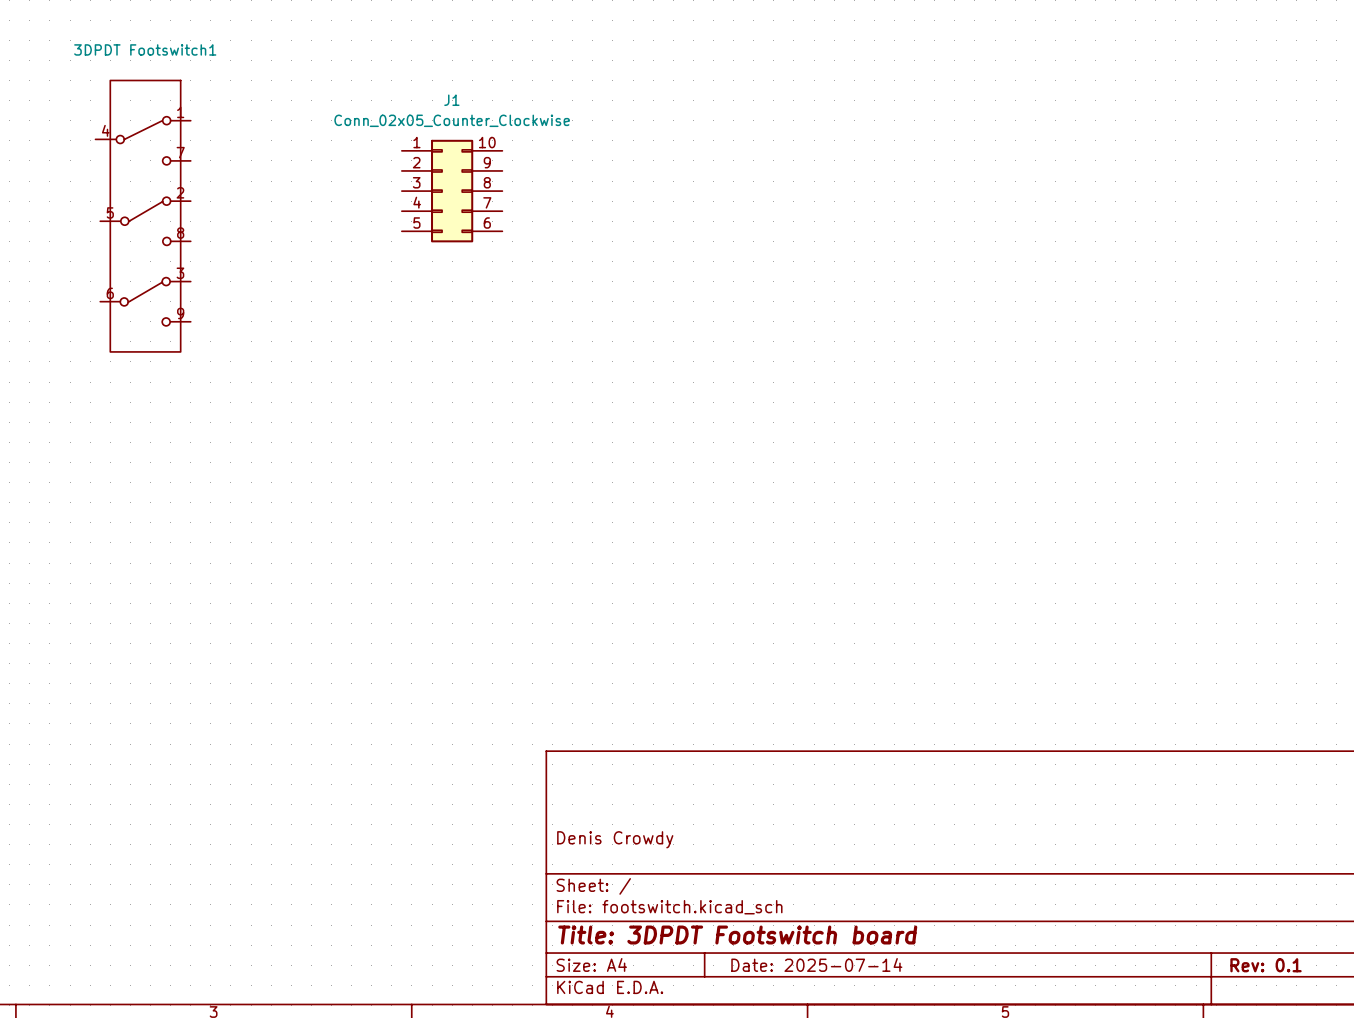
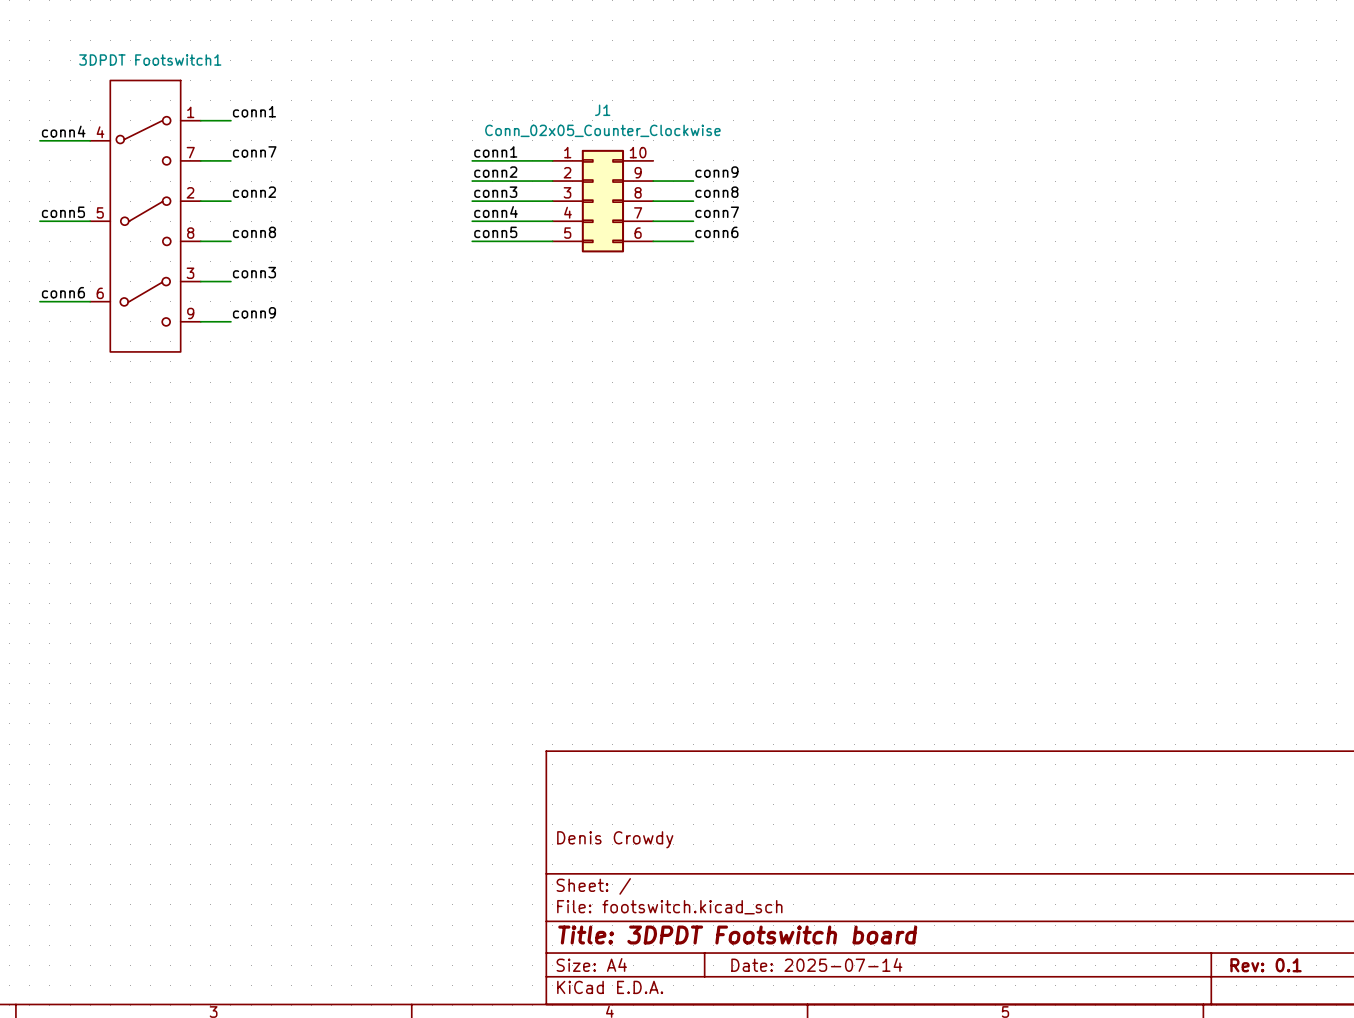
3DPDT Footswitch1 symbol: [95, 80, 191, 352] -> [90, 80, 201, 352]
label: none -> conn1 (254, 111)
wire: none -> (200, 120) (230, 120)
label: none -> conn4 (63, 131)
wire: none -> (39, 140) (90, 140)
label: none -> conn7 (254, 151)
label: none -> conn1 (495, 151)
wire: none -> (200, 160) (230, 160)
wire: none -> (472, 160) (552, 160)
label: none -> conn2 (495, 172)
label: none -> conn9 (716, 172)
wire: none -> (472, 181) (552, 181)
wire: none -> (653, 181) (693, 181)
J1 position: (452, 191) -> (602, 201)
label: none -> conn2 (254, 192)
label: none -> conn3 (495, 192)
label: none -> conn8 (716, 192)
wire: none -> (200, 201) (230, 201)
wire: none -> (472, 201) (552, 201)
wire: none -> (653, 201) (693, 201)
label: none -> conn5 (63, 212)
label: none -> conn4 (496, 212)
label: none -> conn7 (717, 212)
wire: none -> (39, 221) (90, 221)
wire: none -> (472, 221) (552, 221)
wire: none -> (653, 221) (693, 221)
label: none -> conn8 (254, 232)
label: none -> conn5 (495, 232)
label: none -> conn6 (716, 232)
wire: none -> (200, 241) (230, 241)
wire: none -> (472, 241) (552, 241)
wire: none -> (653, 241) (693, 241)
label: none -> conn3 (254, 272)
wire: none -> (200, 281) (230, 281)
label: none -> conn6 (63, 292)
wire: none -> (39, 301) (90, 301)
label: none -> conn9 (254, 312)
wire: none -> (200, 321) (230, 321)

